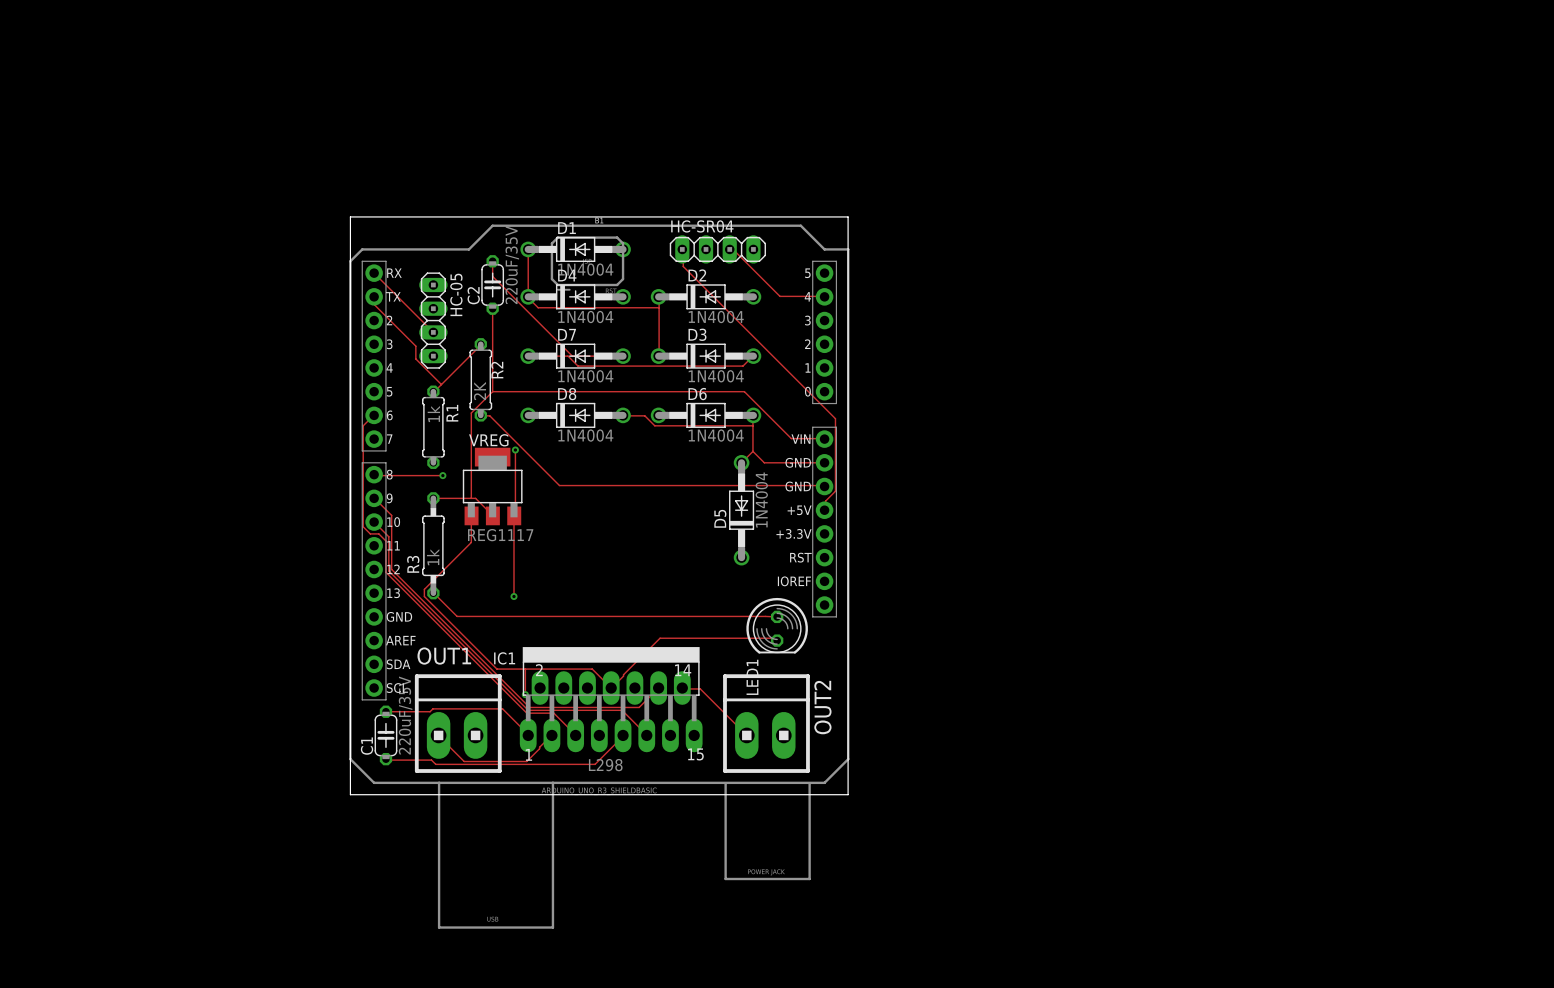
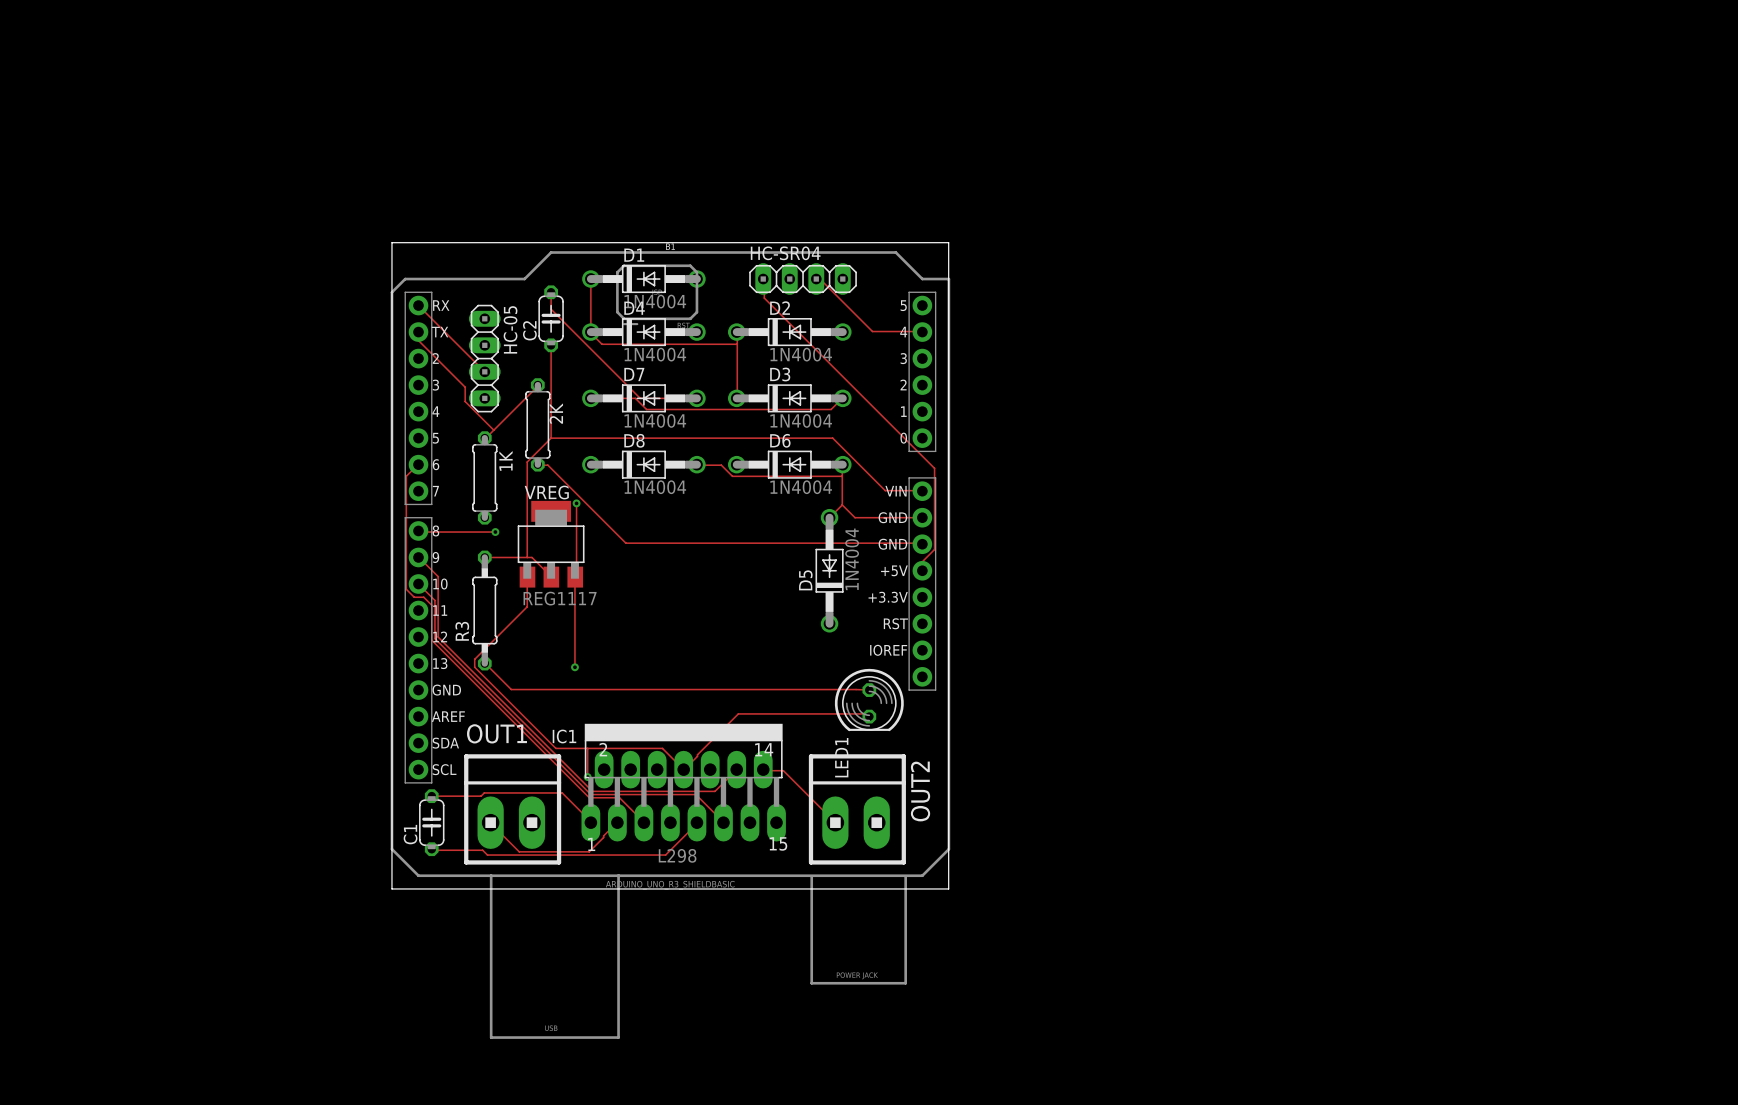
C2 value: 220uF/35V (512, 265) -> none
R2 name: R2 (497, 370) -> 2K (556, 413)
R2 value: 2K (479, 391) -> none
R1 name: R1 (452, 413) -> 1K (506, 460)
R1 value: 1k (433, 414) -> none
R3 value: 1k (433, 557) -> none
C1 value: 220uF/35V (405, 715) -> none

